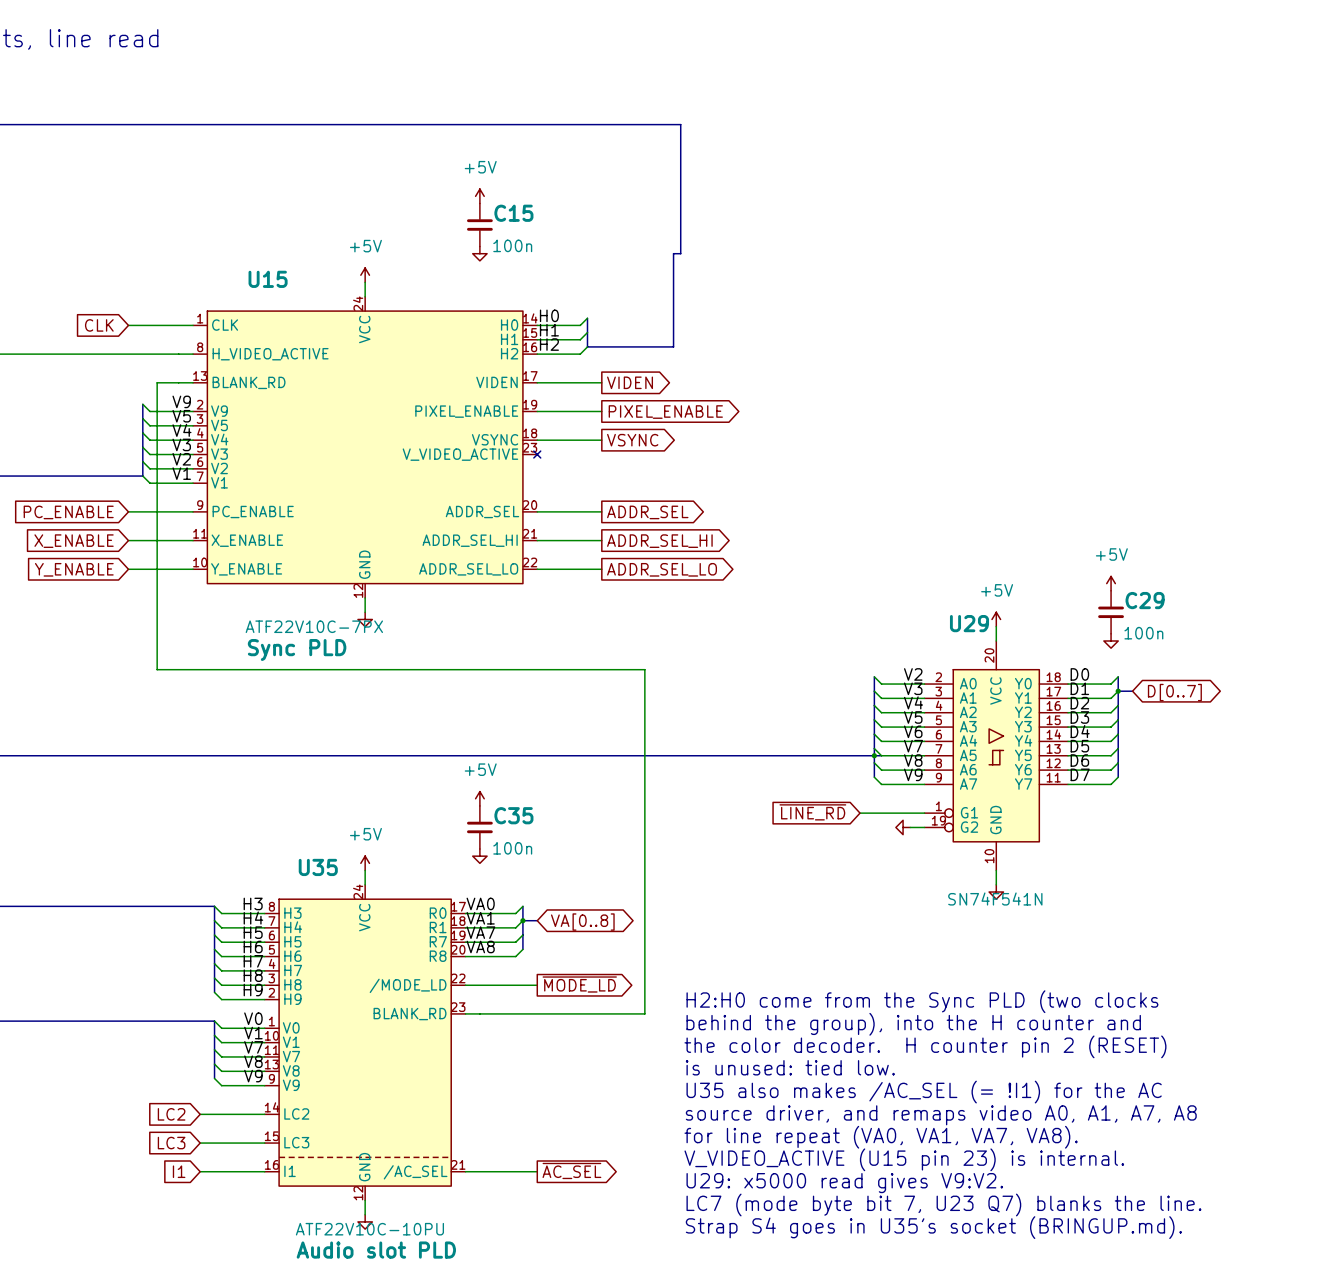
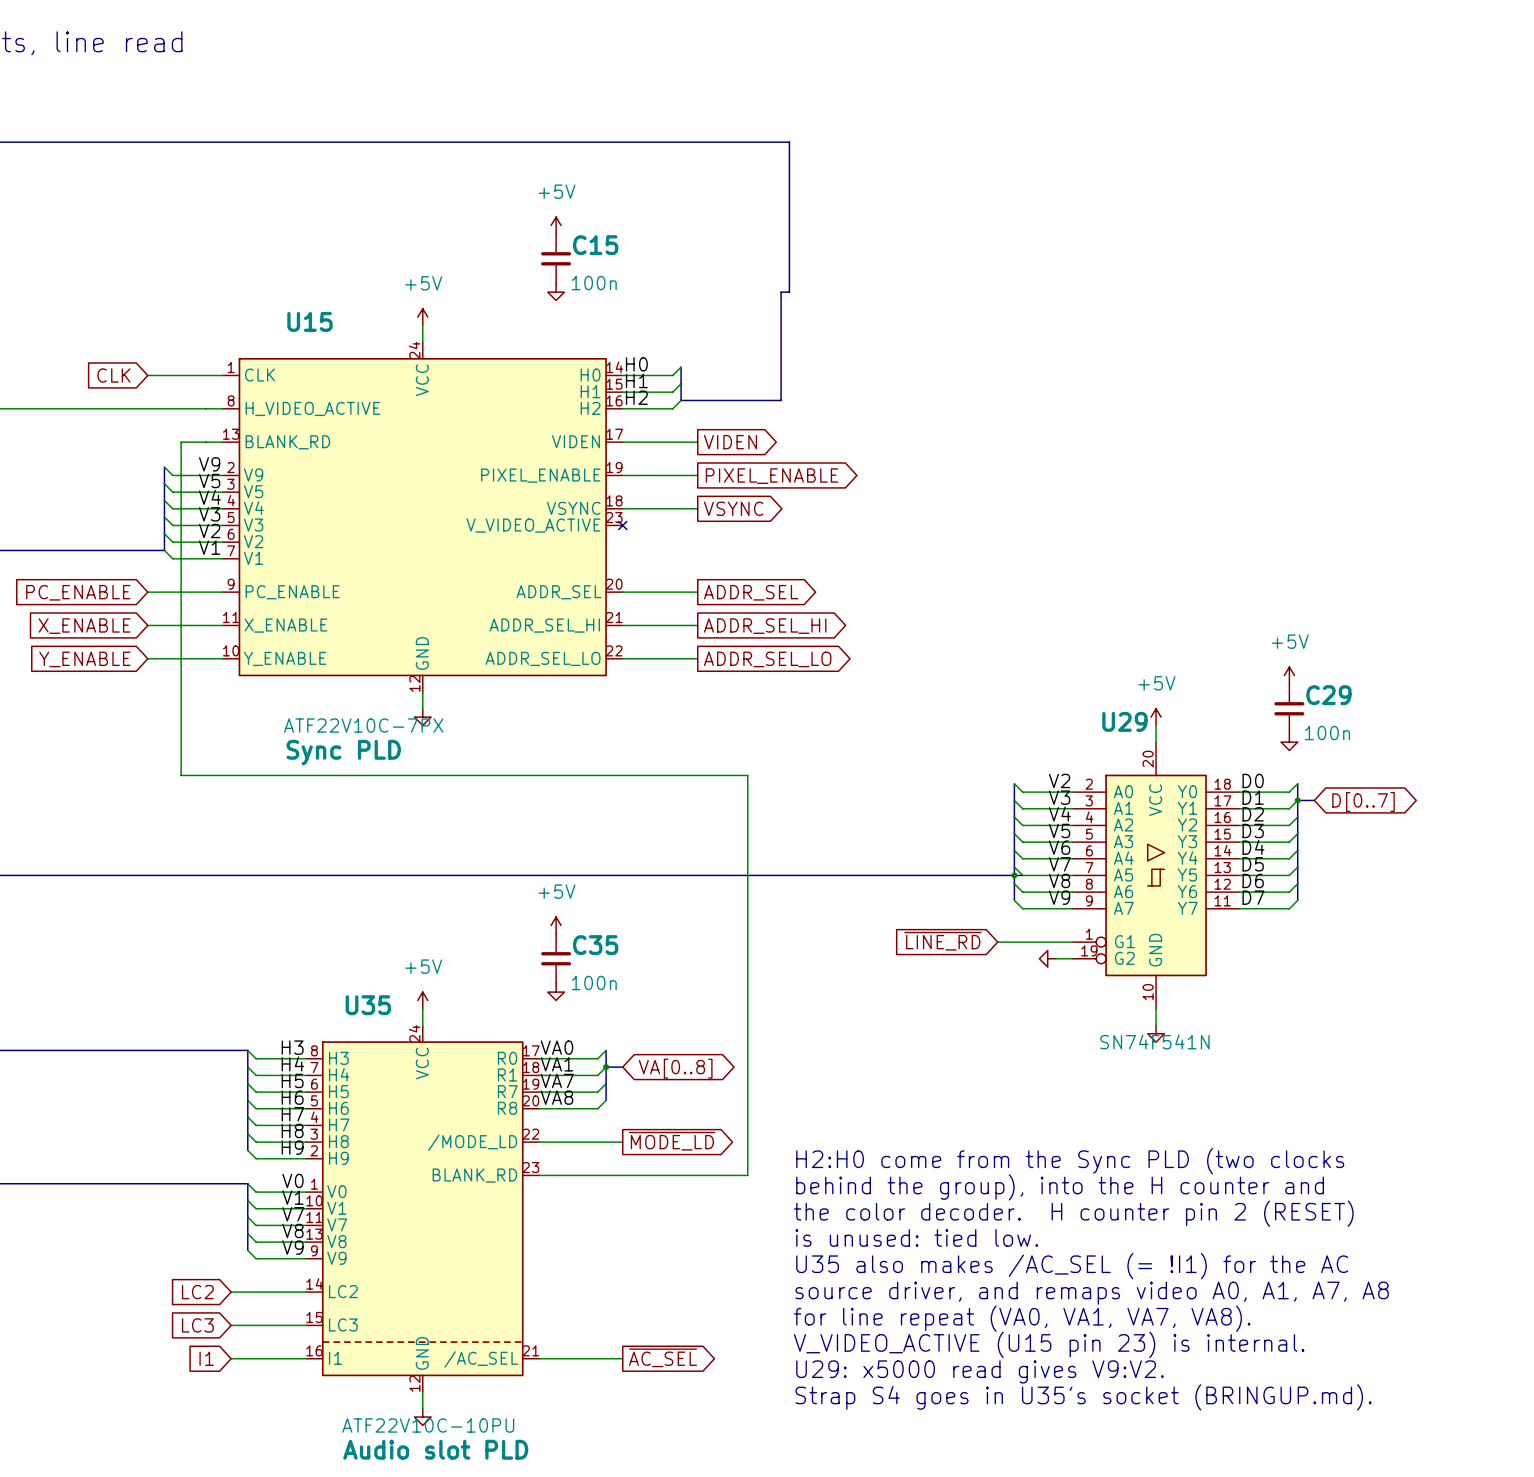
text: LC7 (mode byte bit 7, U23 Q7) blanks the line. (943, 1205) -> Strap S4 goes in U35's socket (BRINGUP.md). (1083, 1397)
text: Strap S4 goes in U35's socket (BRINGUP.md). (933, 1227) -> none

